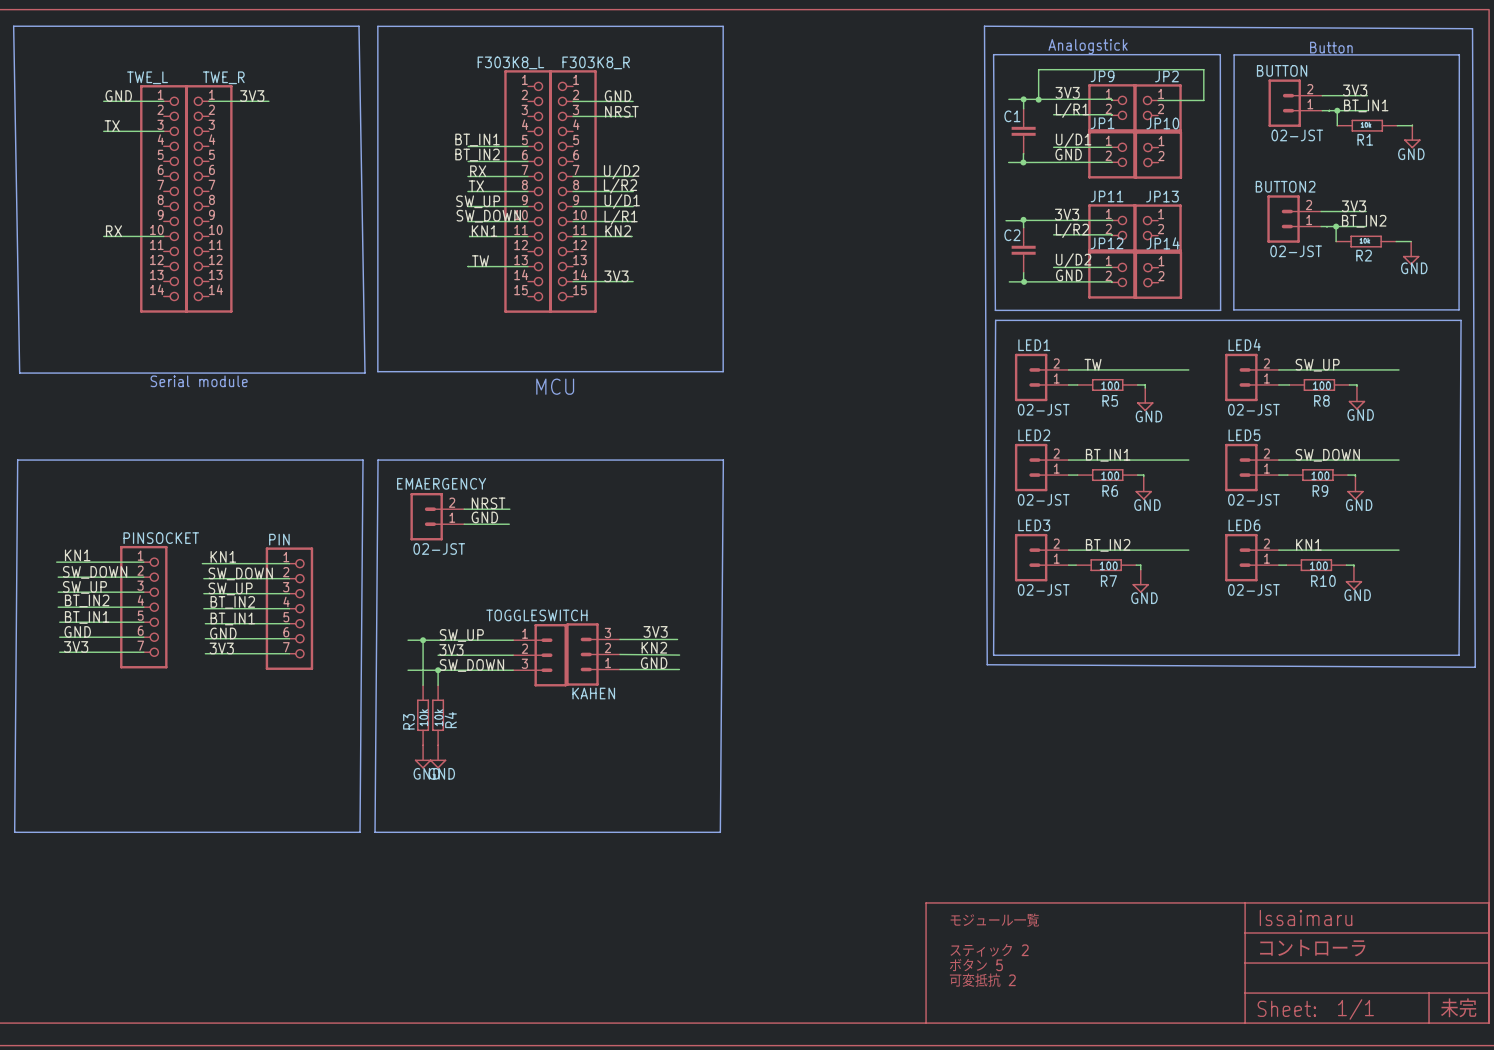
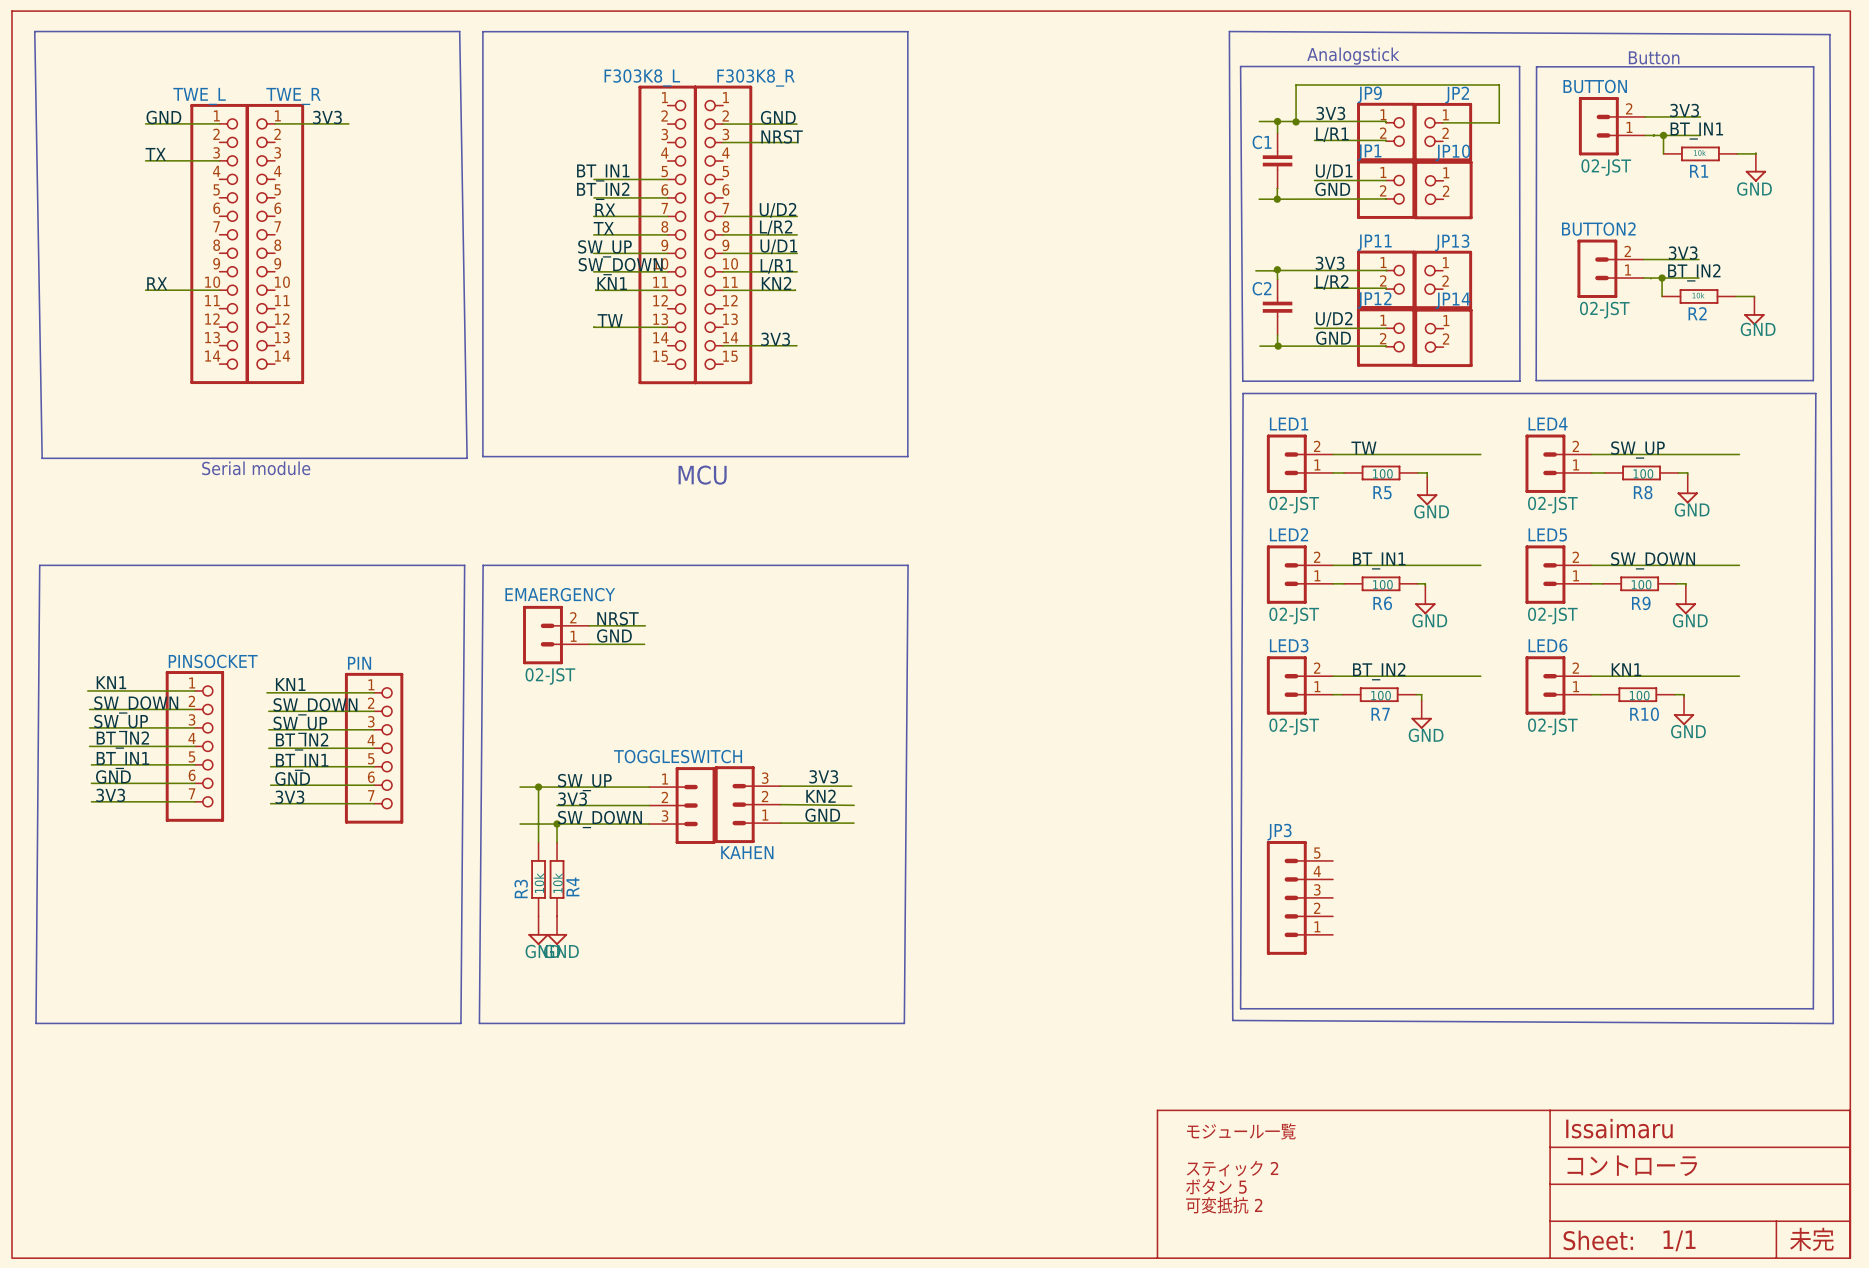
line: (984, 26) (987, 664) (1475, 667) (1472, 28) -> (1229, 31) (1232, 1020) (1833, 1023) (1829, 34)
line: (995, 320) (993, 655) (1459, 655) (1461, 320) -> (1243, 393) (1240, 1008) (1813, 1008) (1815, 393)
JP3: none -> (1299, 897)

